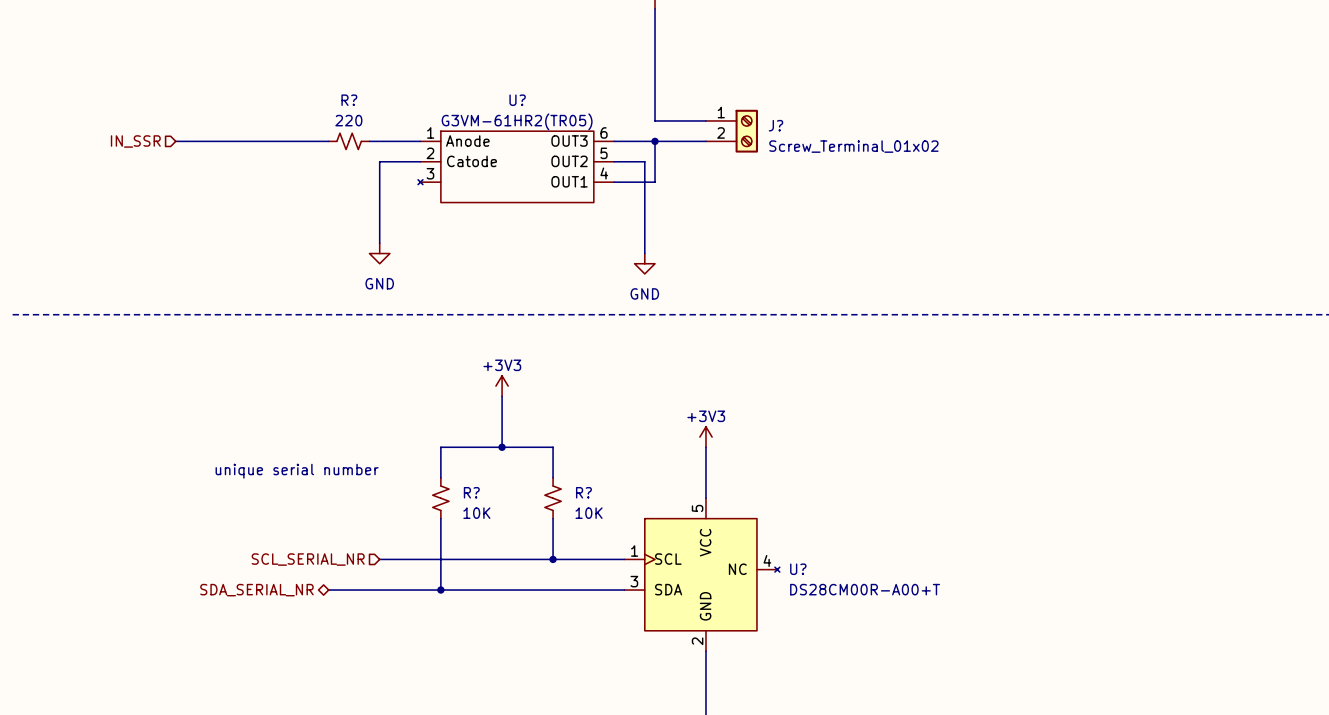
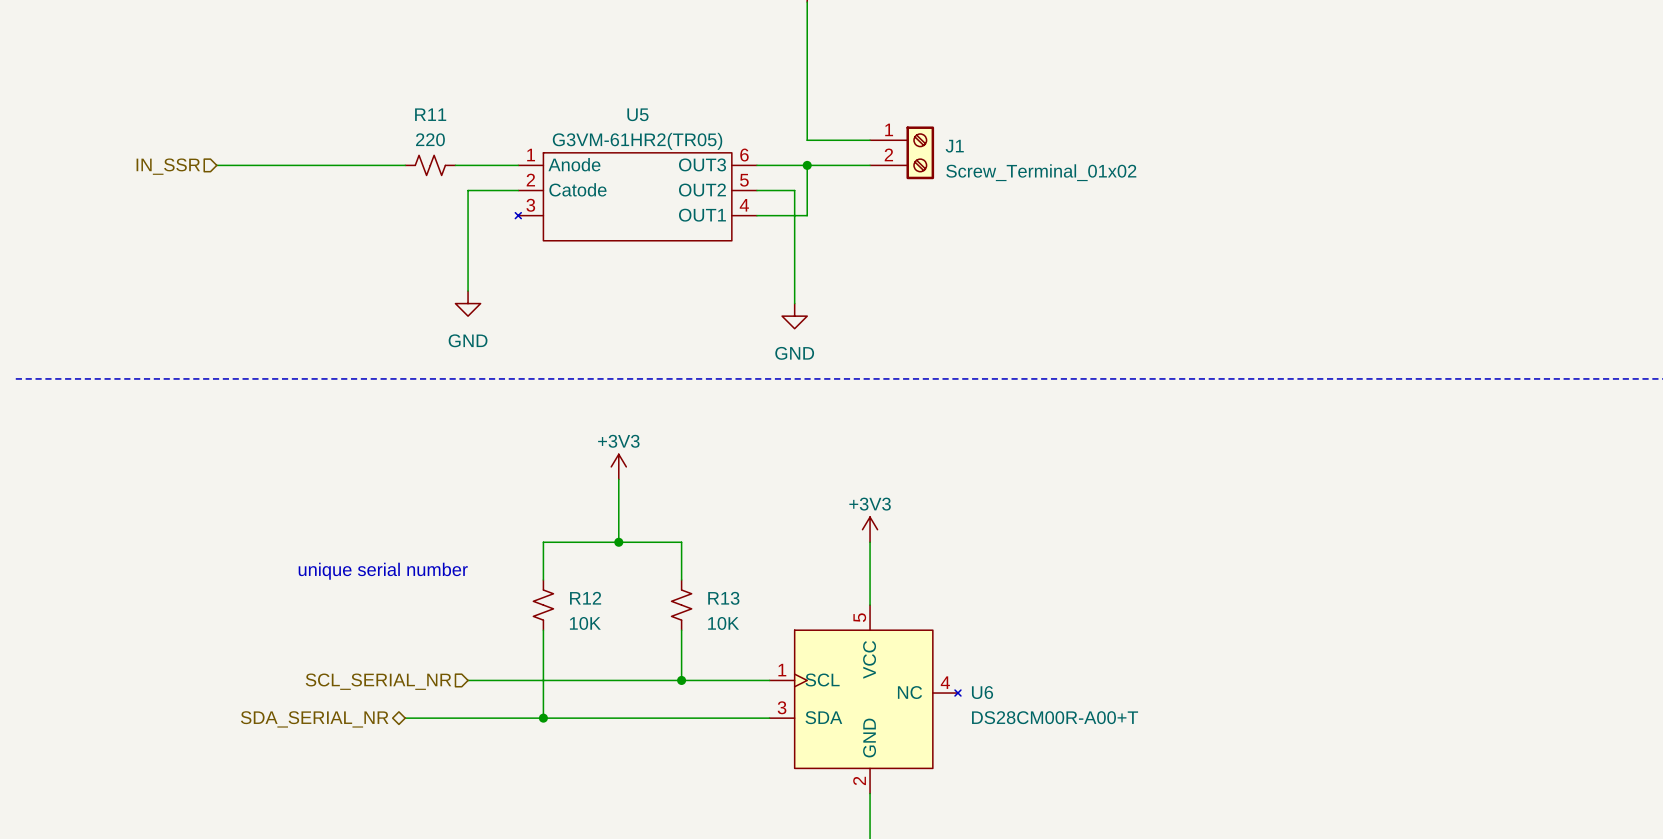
R? name: R? (349, 100) -> R11 (430, 114)
U? name: U? (517, 100) -> U5 (637, 114)
J? name: J? (775, 125) -> J1 (954, 146)
R? name: R? (471, 492) -> R12 (585, 598)
R? name: R? (583, 492) -> R13 (723, 598)
U? name: U? (798, 569) -> U6 (982, 692)

